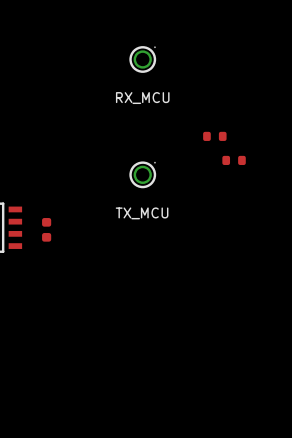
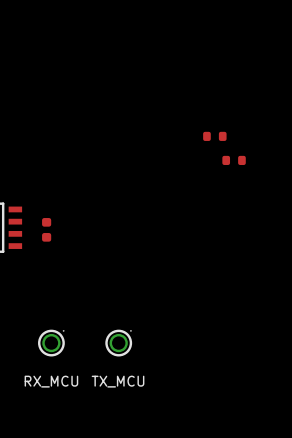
part: RX_MCU (142, 59) -> none
part position: (142, 174) -> (118, 343)
part: none -> RX_MCU (51, 343)

